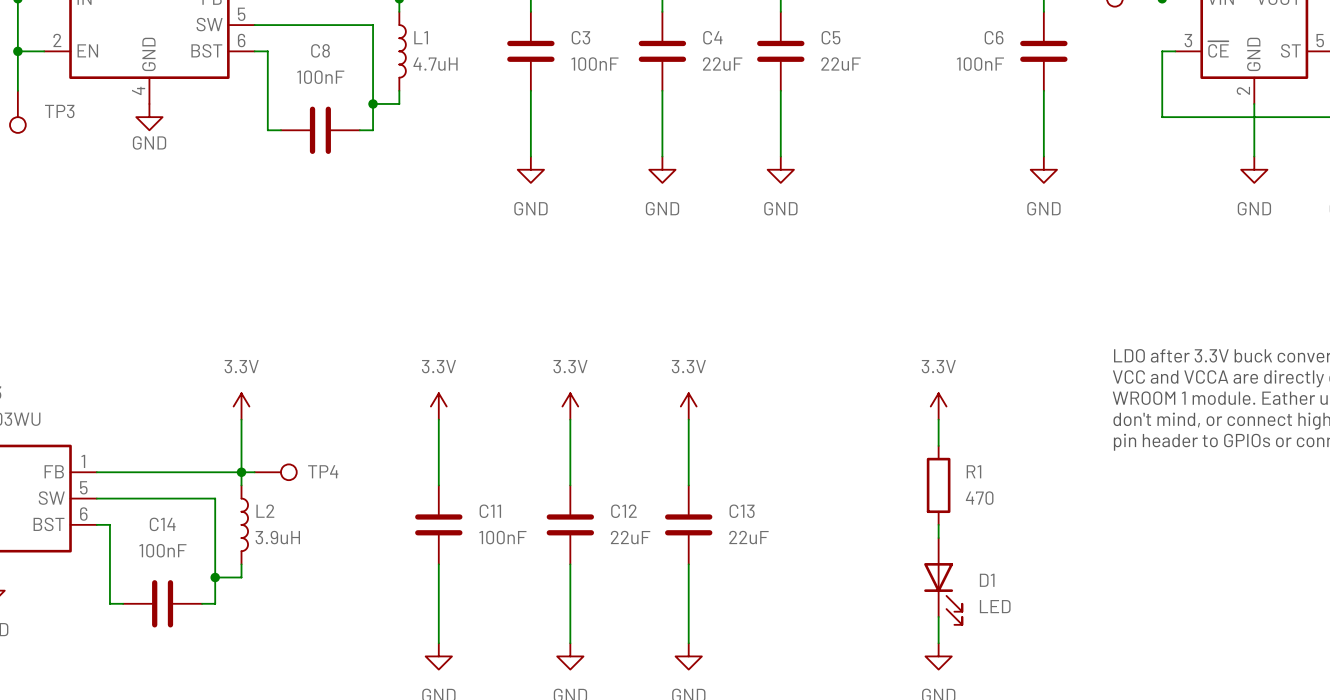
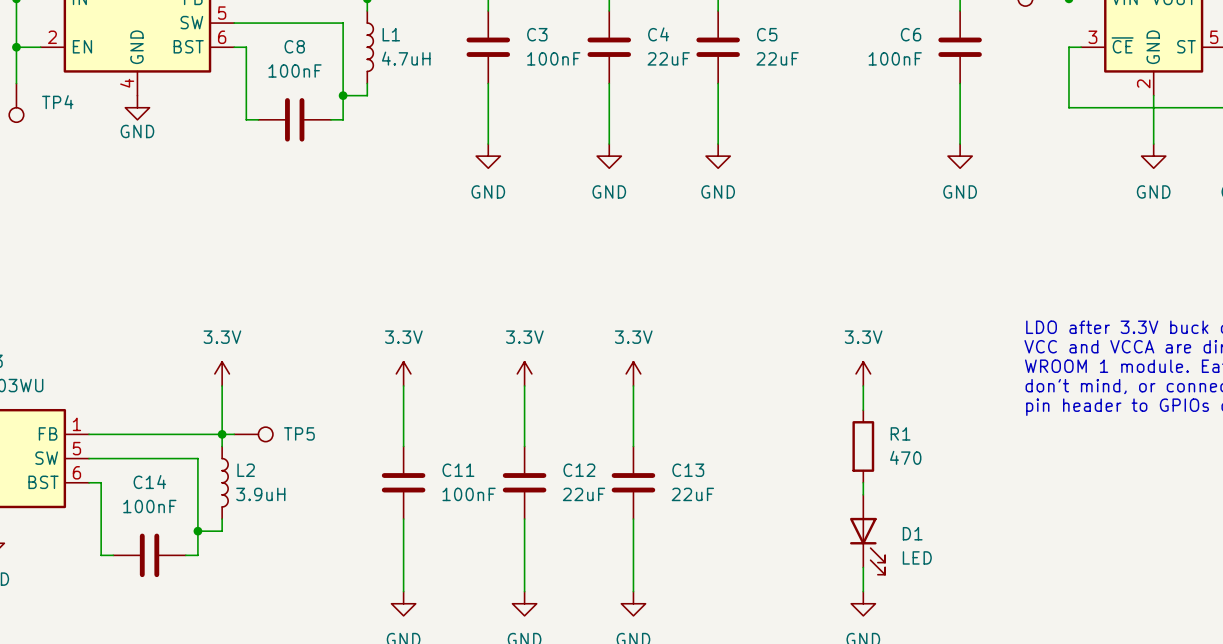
TP3 name: TP3 (59, 111) -> TP4 (57, 102)
TP4 name: TP4 (323, 471) -> TP5 (299, 433)

